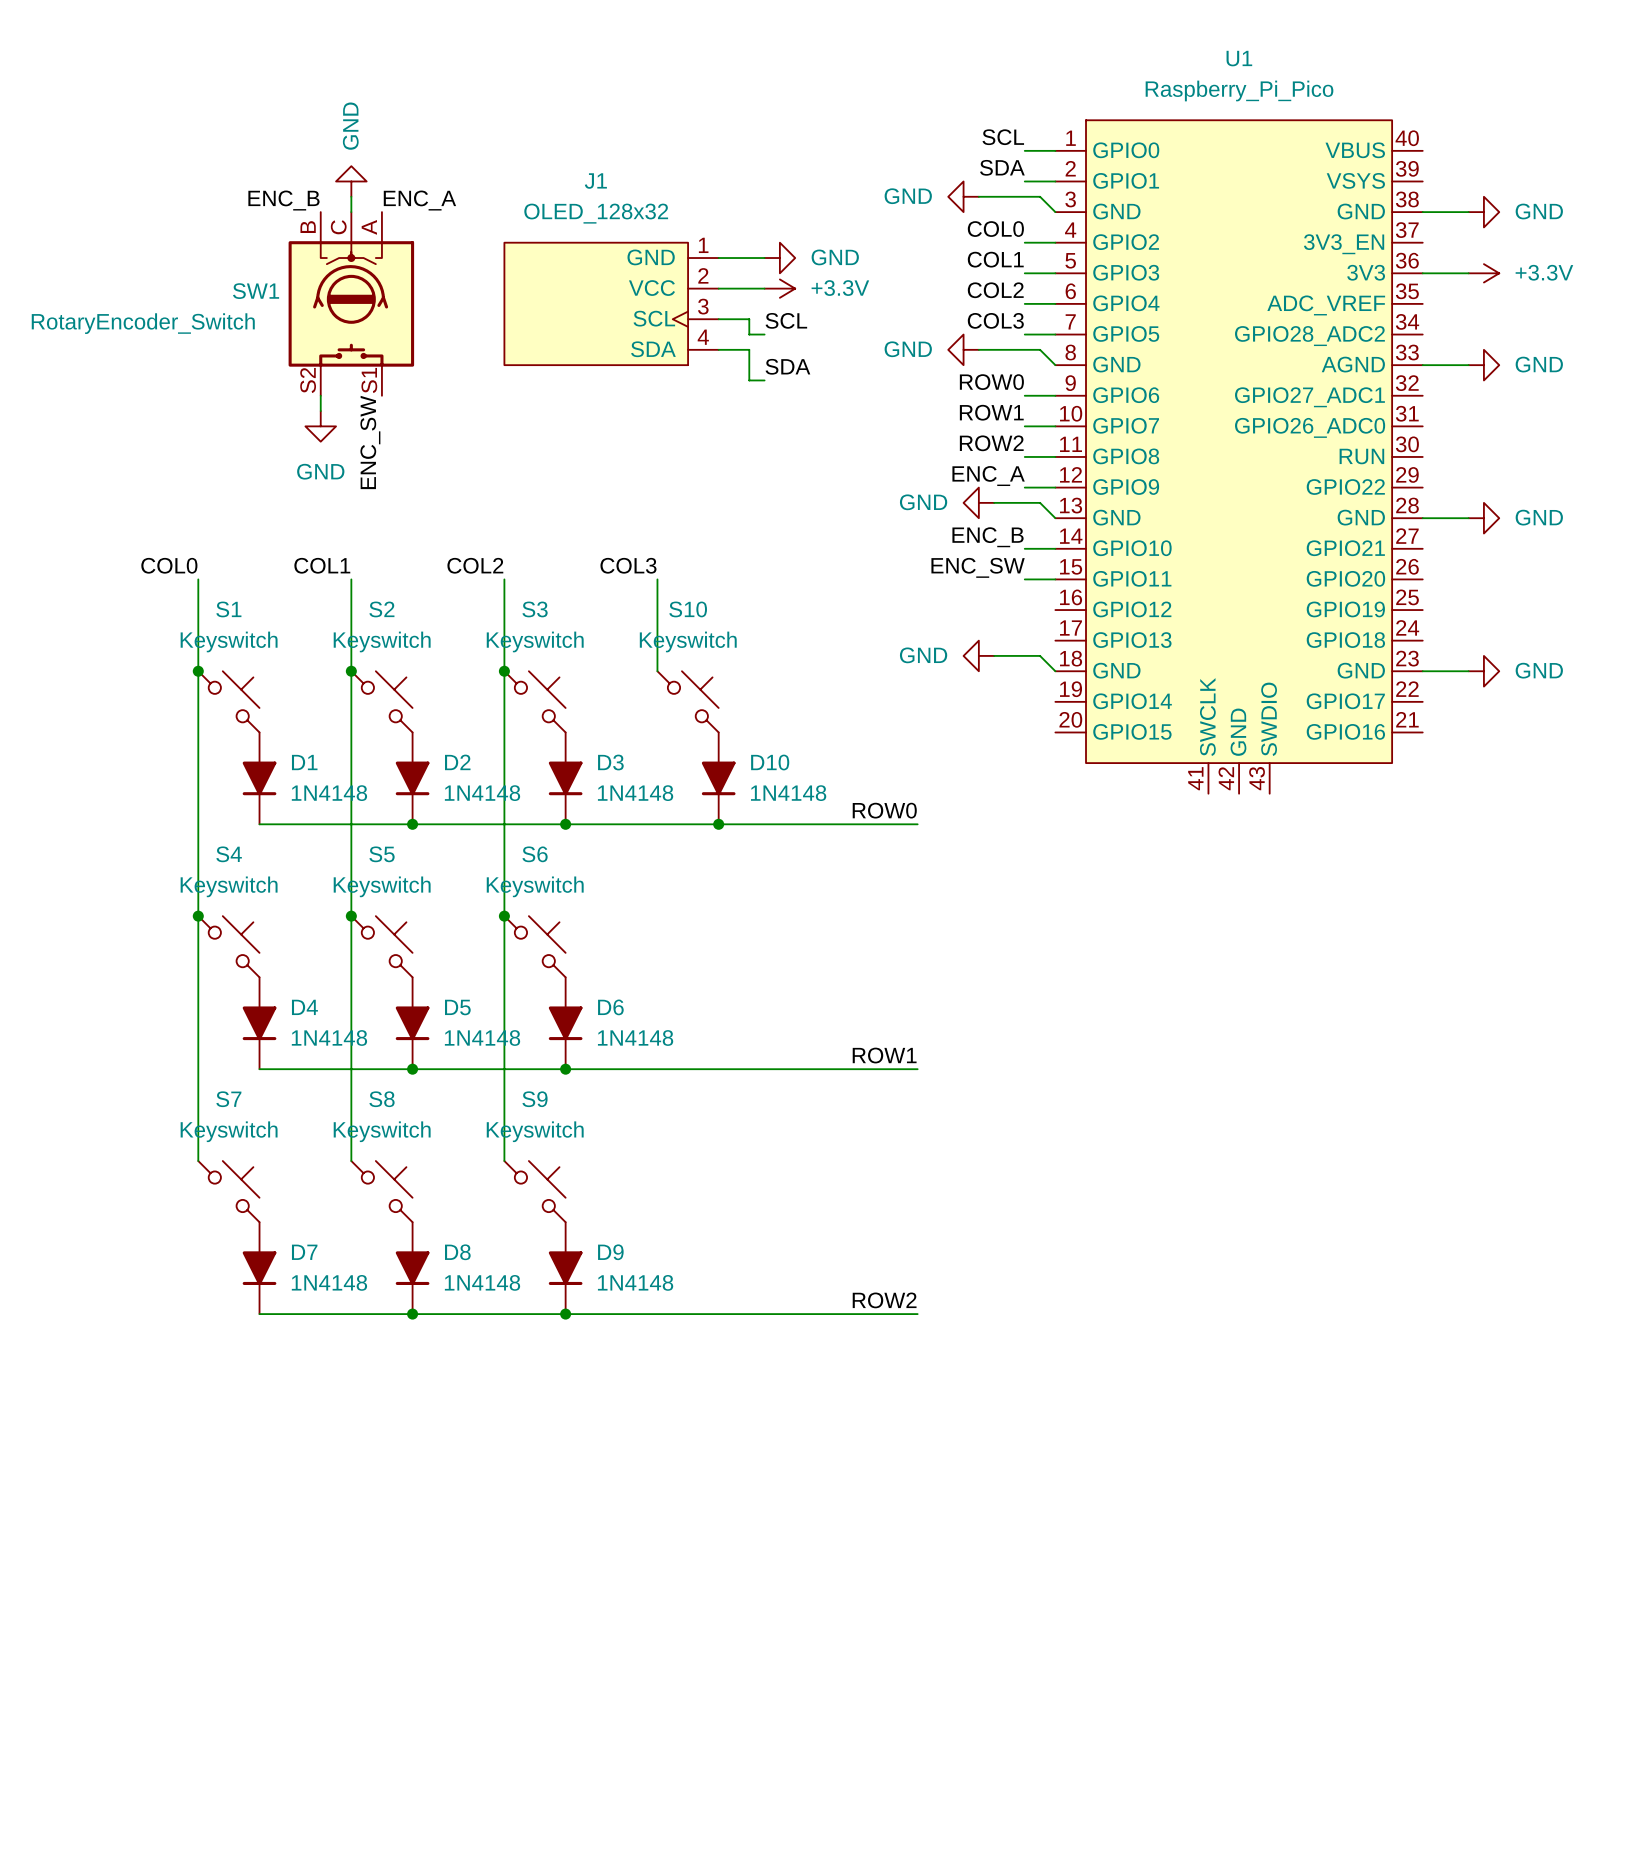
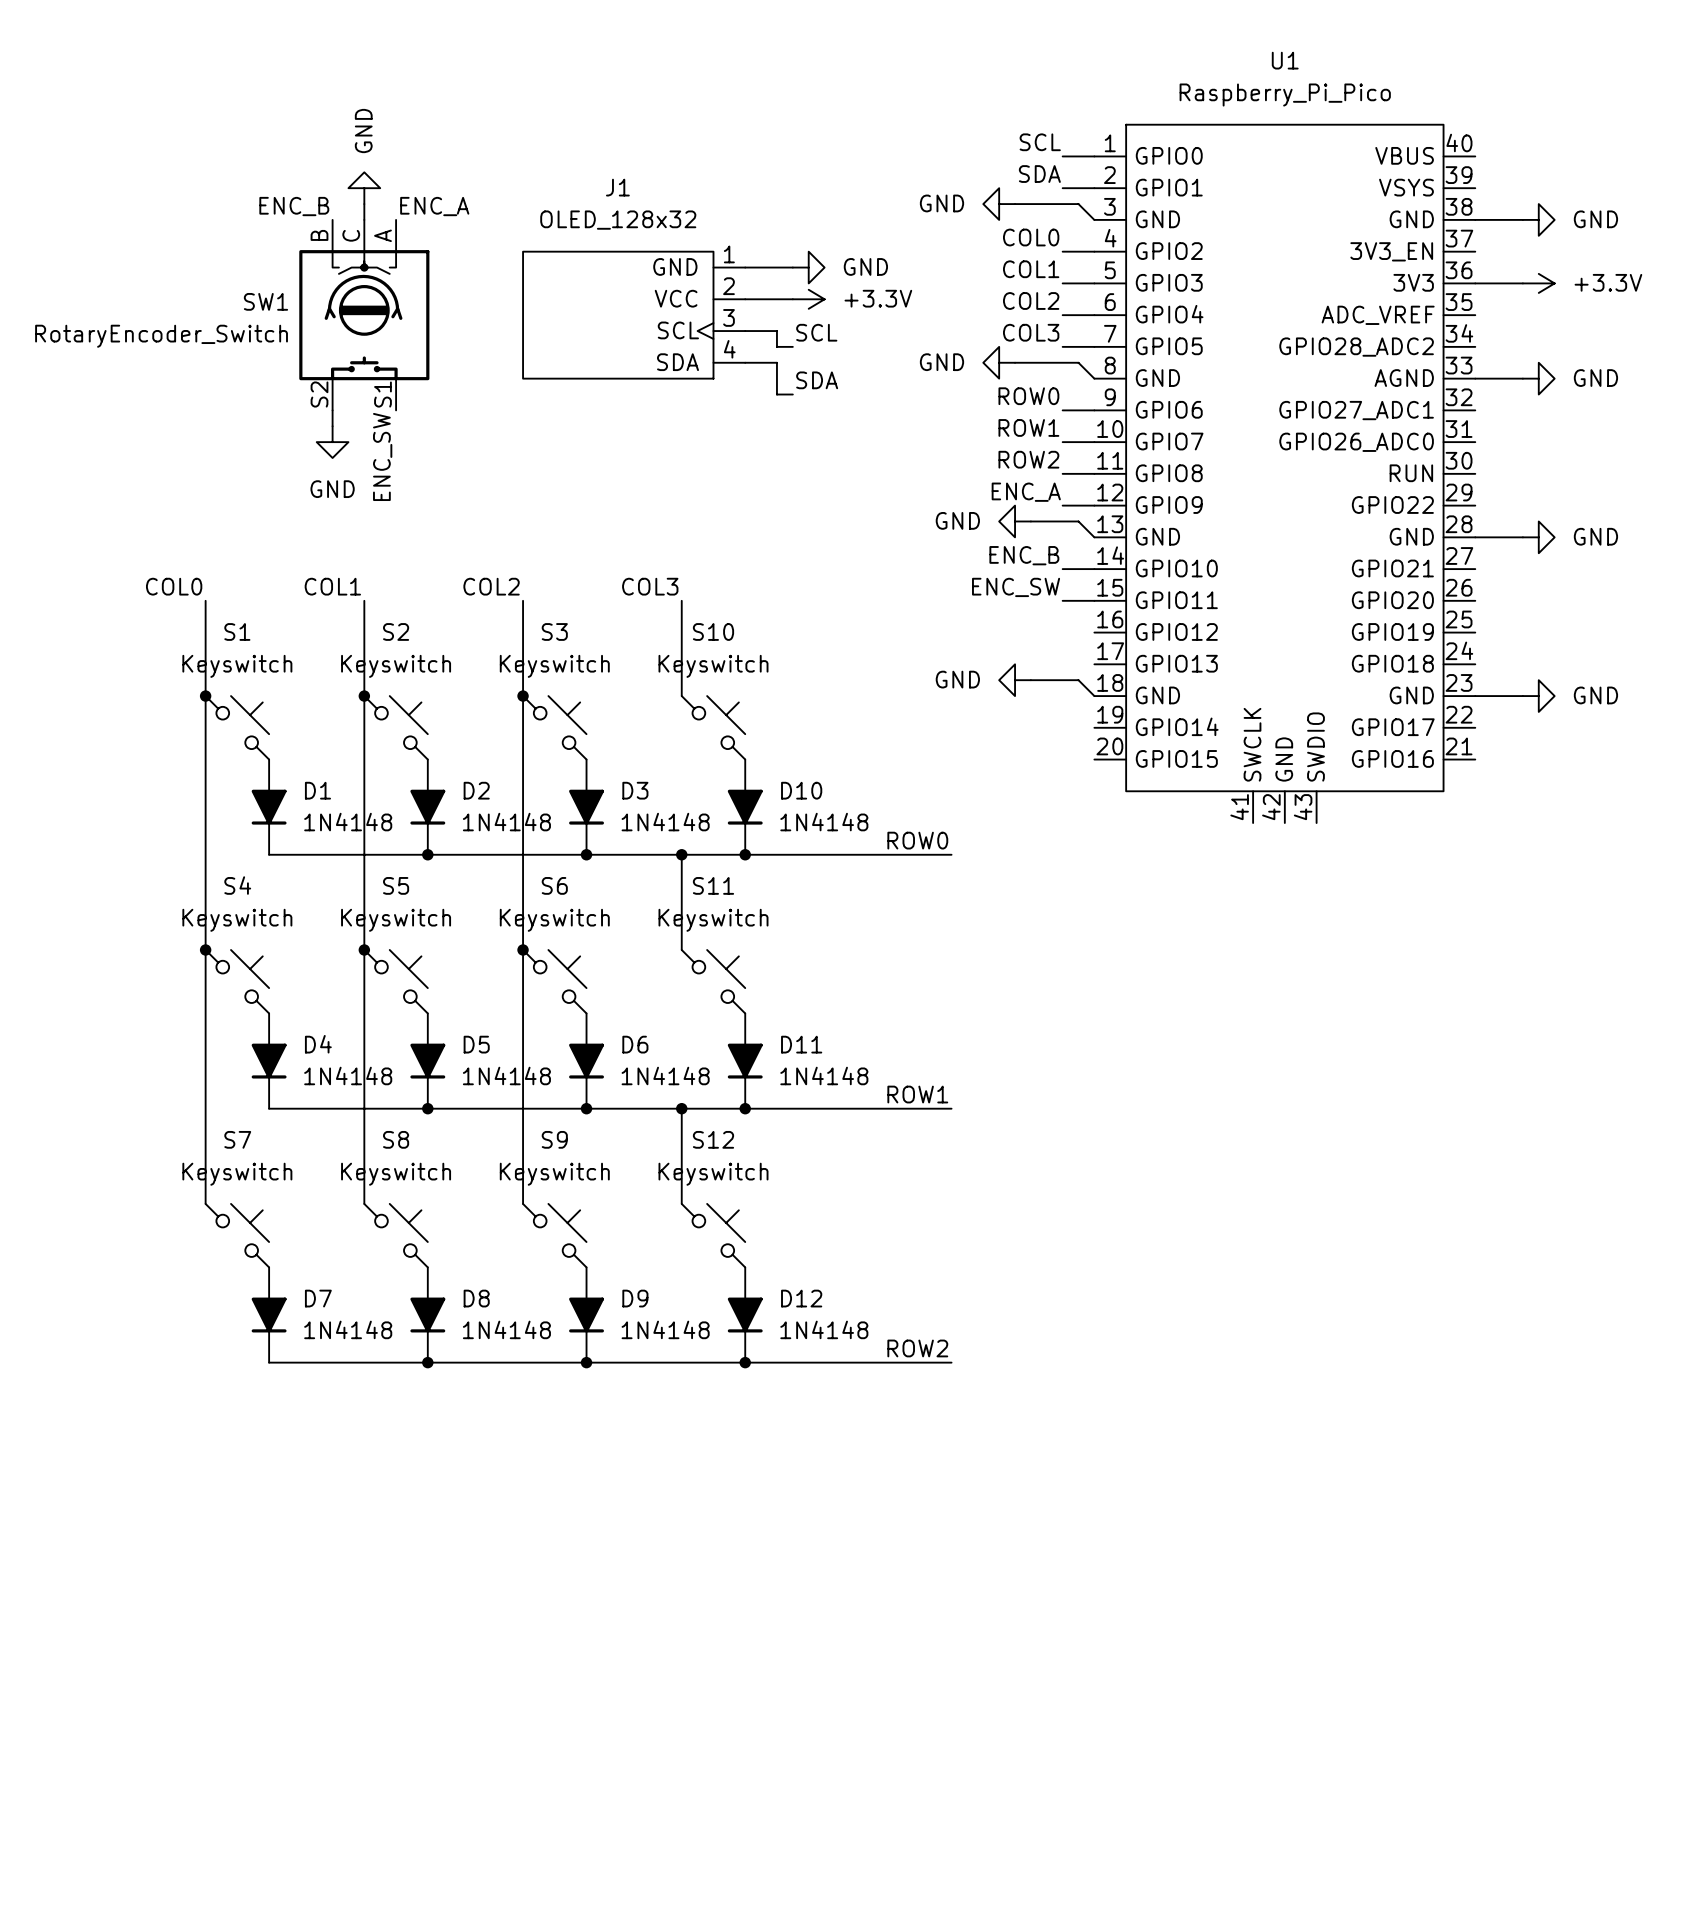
wire: none -> (681, 854) (681, 949)
junction: none -> (681, 854)
S11: none -> Keyswitch (713, 981)
D11: none -> 1N4148 (745, 1061)
wire: none -> (681, 1108) (681, 1203)
junction: none -> (681, 1108)
junction: none -> (745, 1108)
S12: none -> Keyswitch (713, 1235)
D12: none -> 1N4148 (745, 1315)
junction: none -> (745, 1362)

